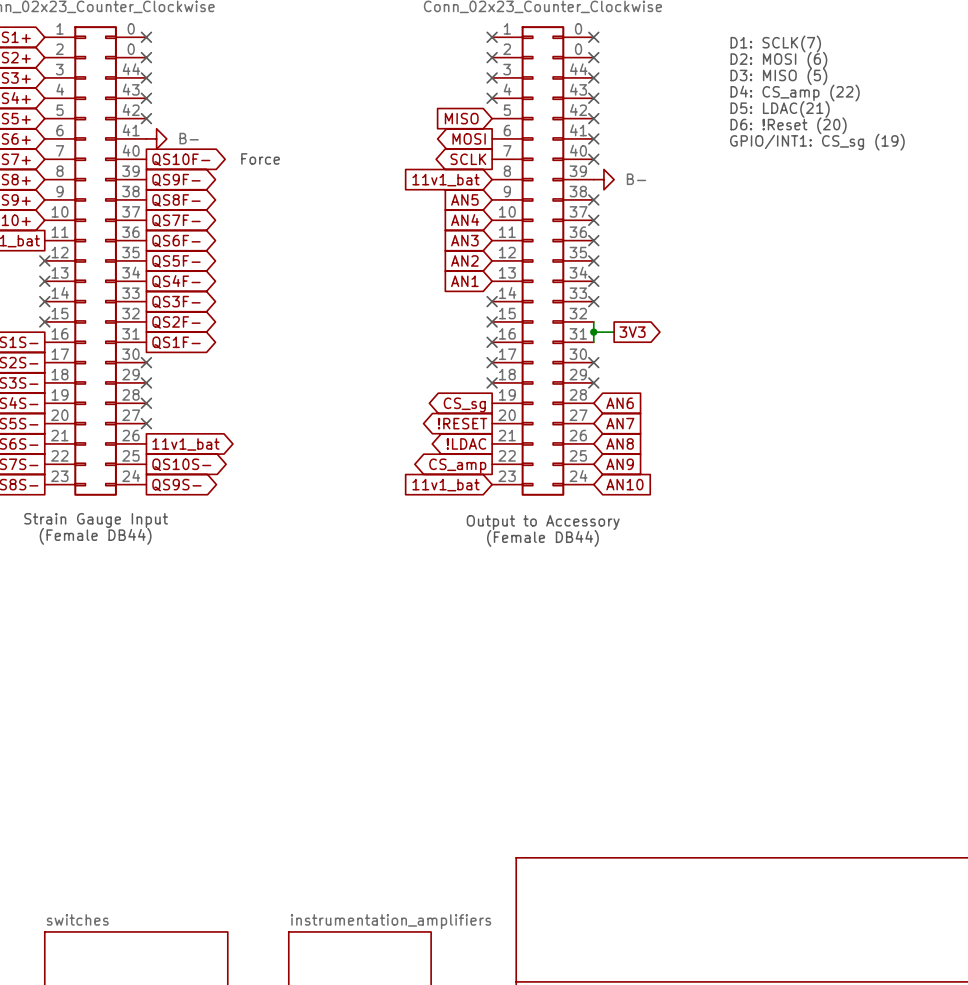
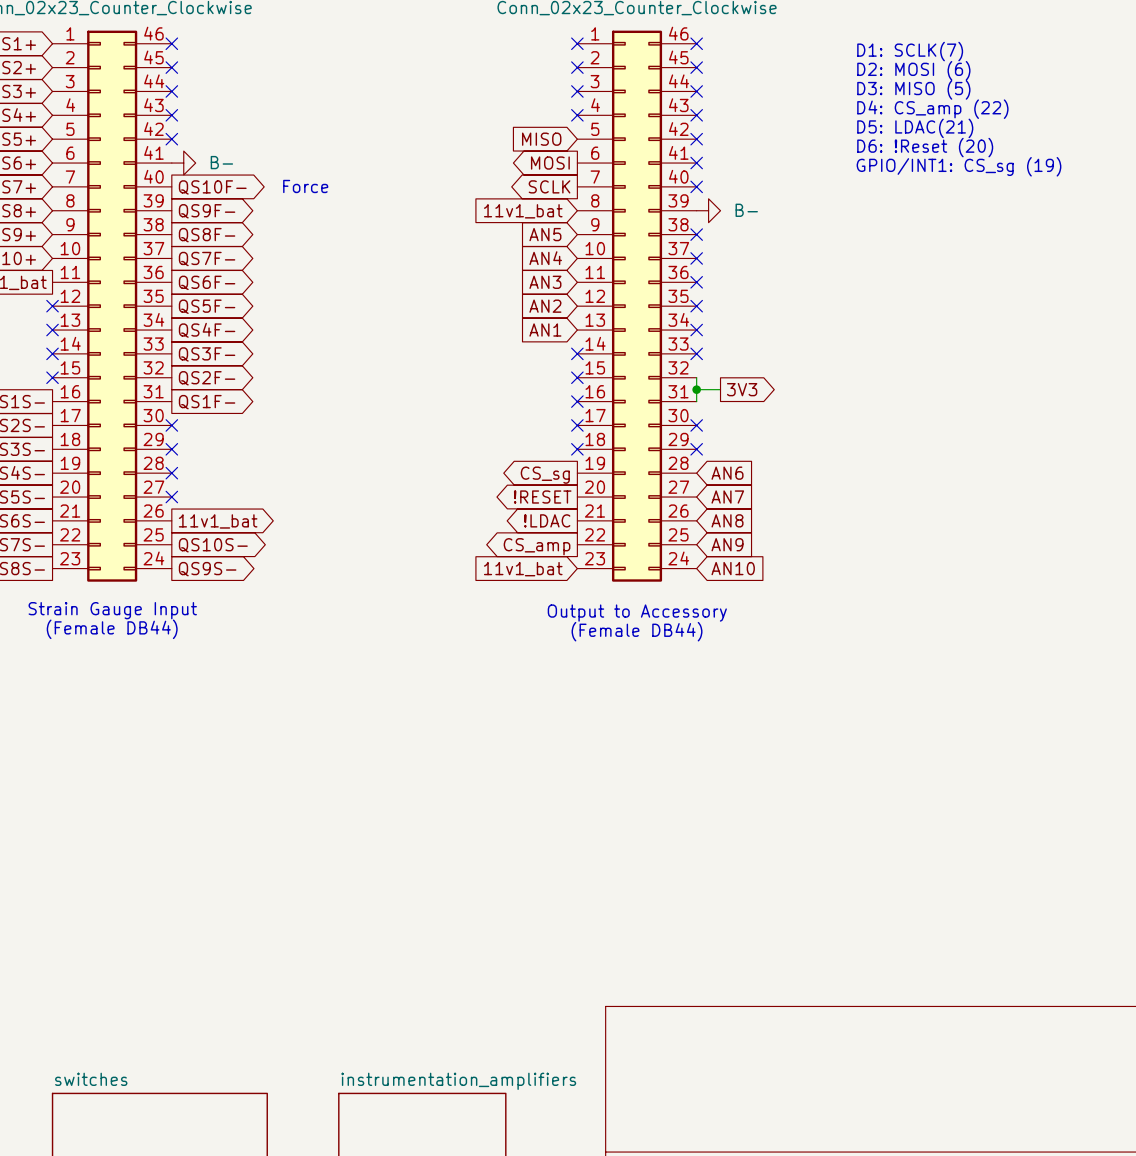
part pin number: 0 (131, 28) -> 46 (153, 33)
part pin number: 0 (578, 28) -> 46 (678, 33)
part pin number: 0 (131, 49) -> 45 (153, 57)
part pin number: 0 (578, 49) -> 45 (678, 57)

